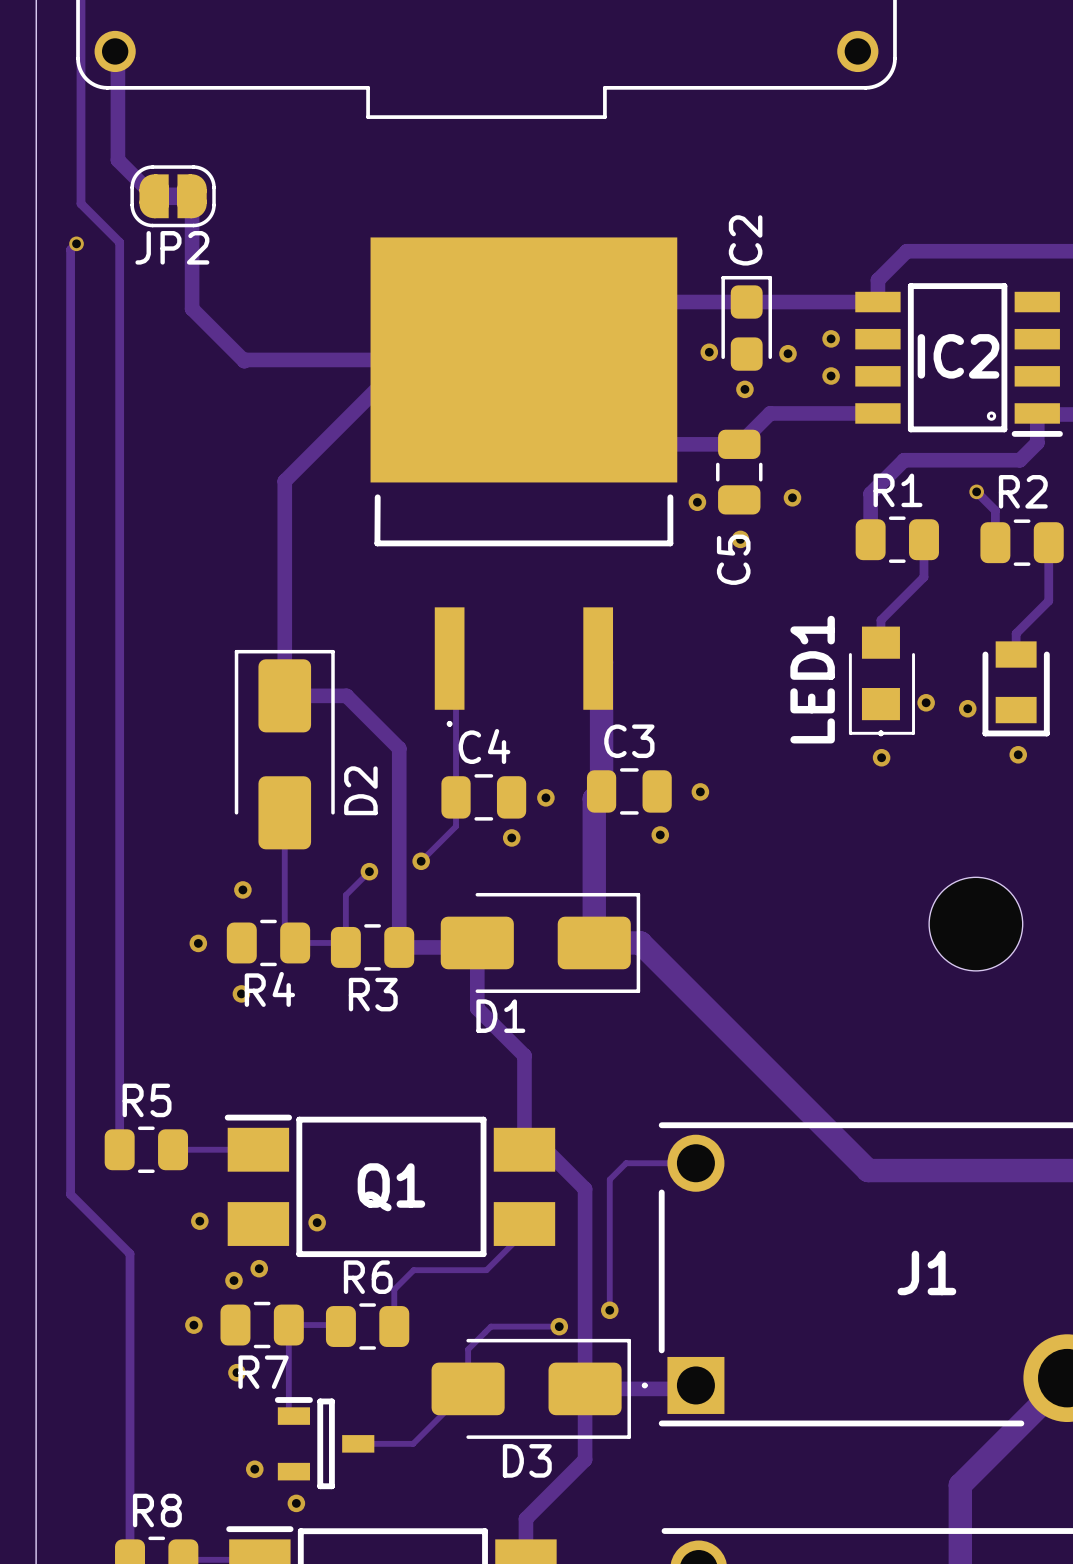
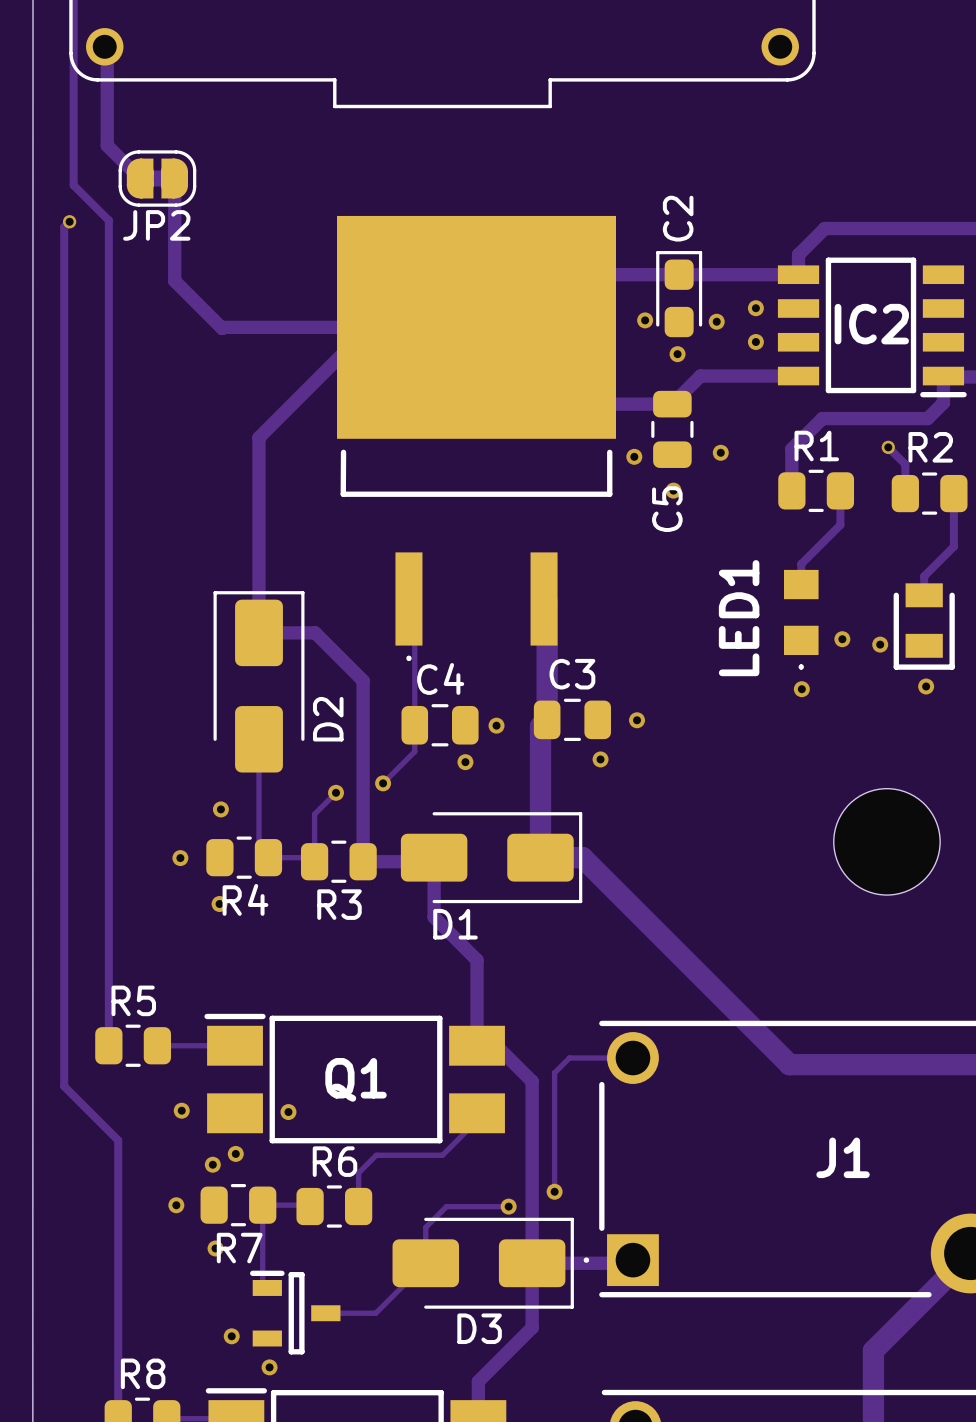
drawing: [986, 411, 997, 421] -> none
line: (850, 654) (850, 733) (879, 733) -> none
line: (913, 654) (913, 733) (882, 733) -> none
part footprint: [929, 877, 1023, 971] -> [833, 788, 941, 896]

